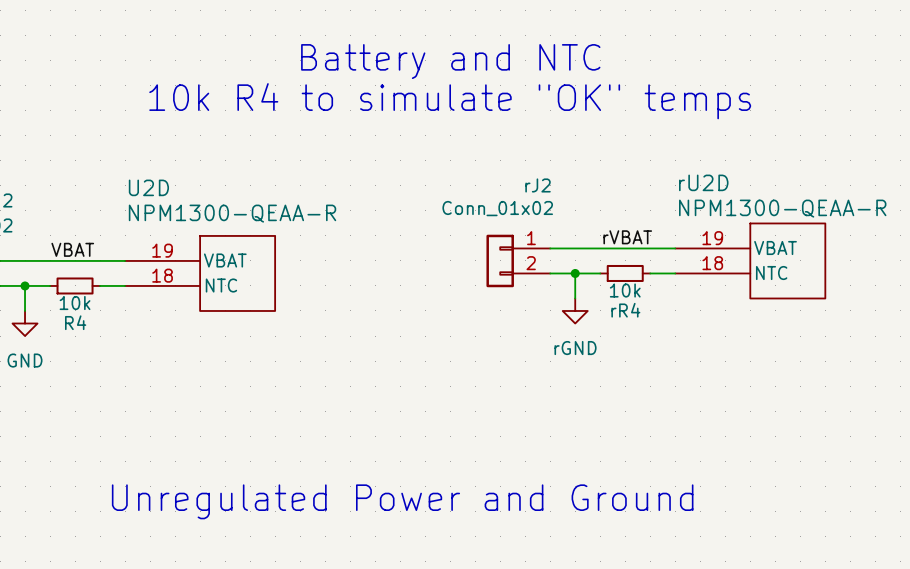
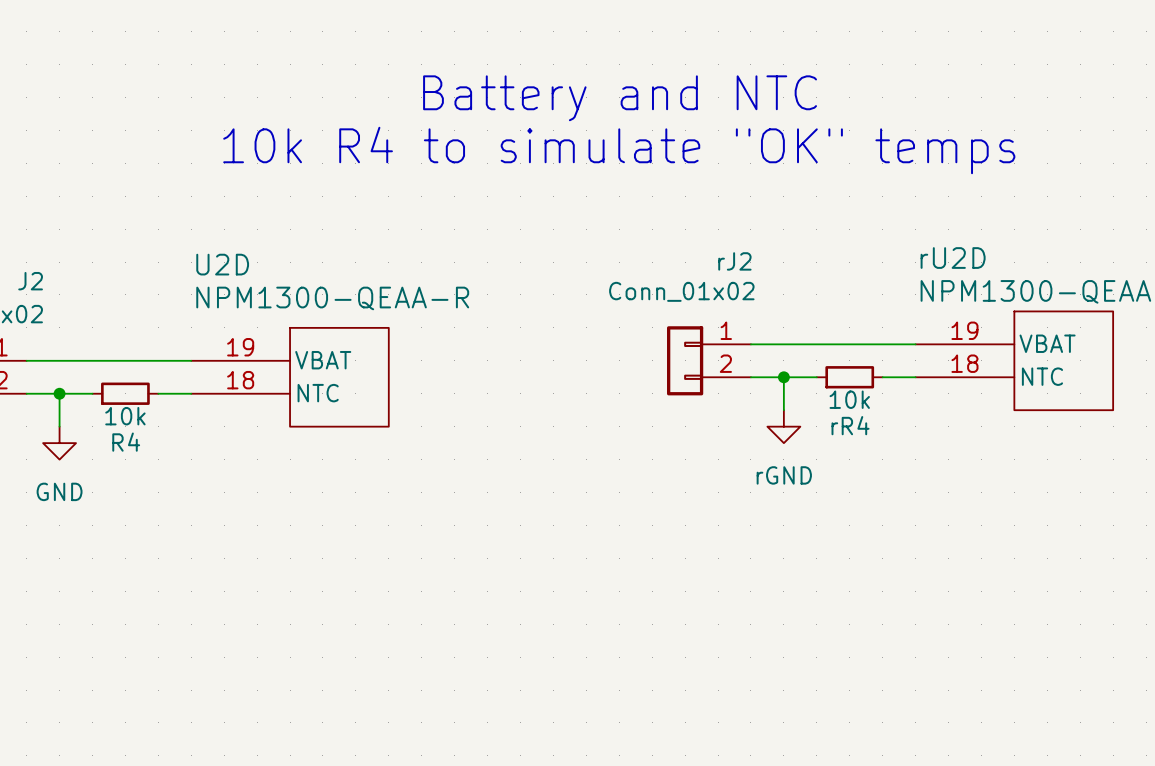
label: rVBAT (627, 237) -> none
label: VBAT (72, 249) -> none
text: Unregulated Power and Ground (402, 501) -> none

